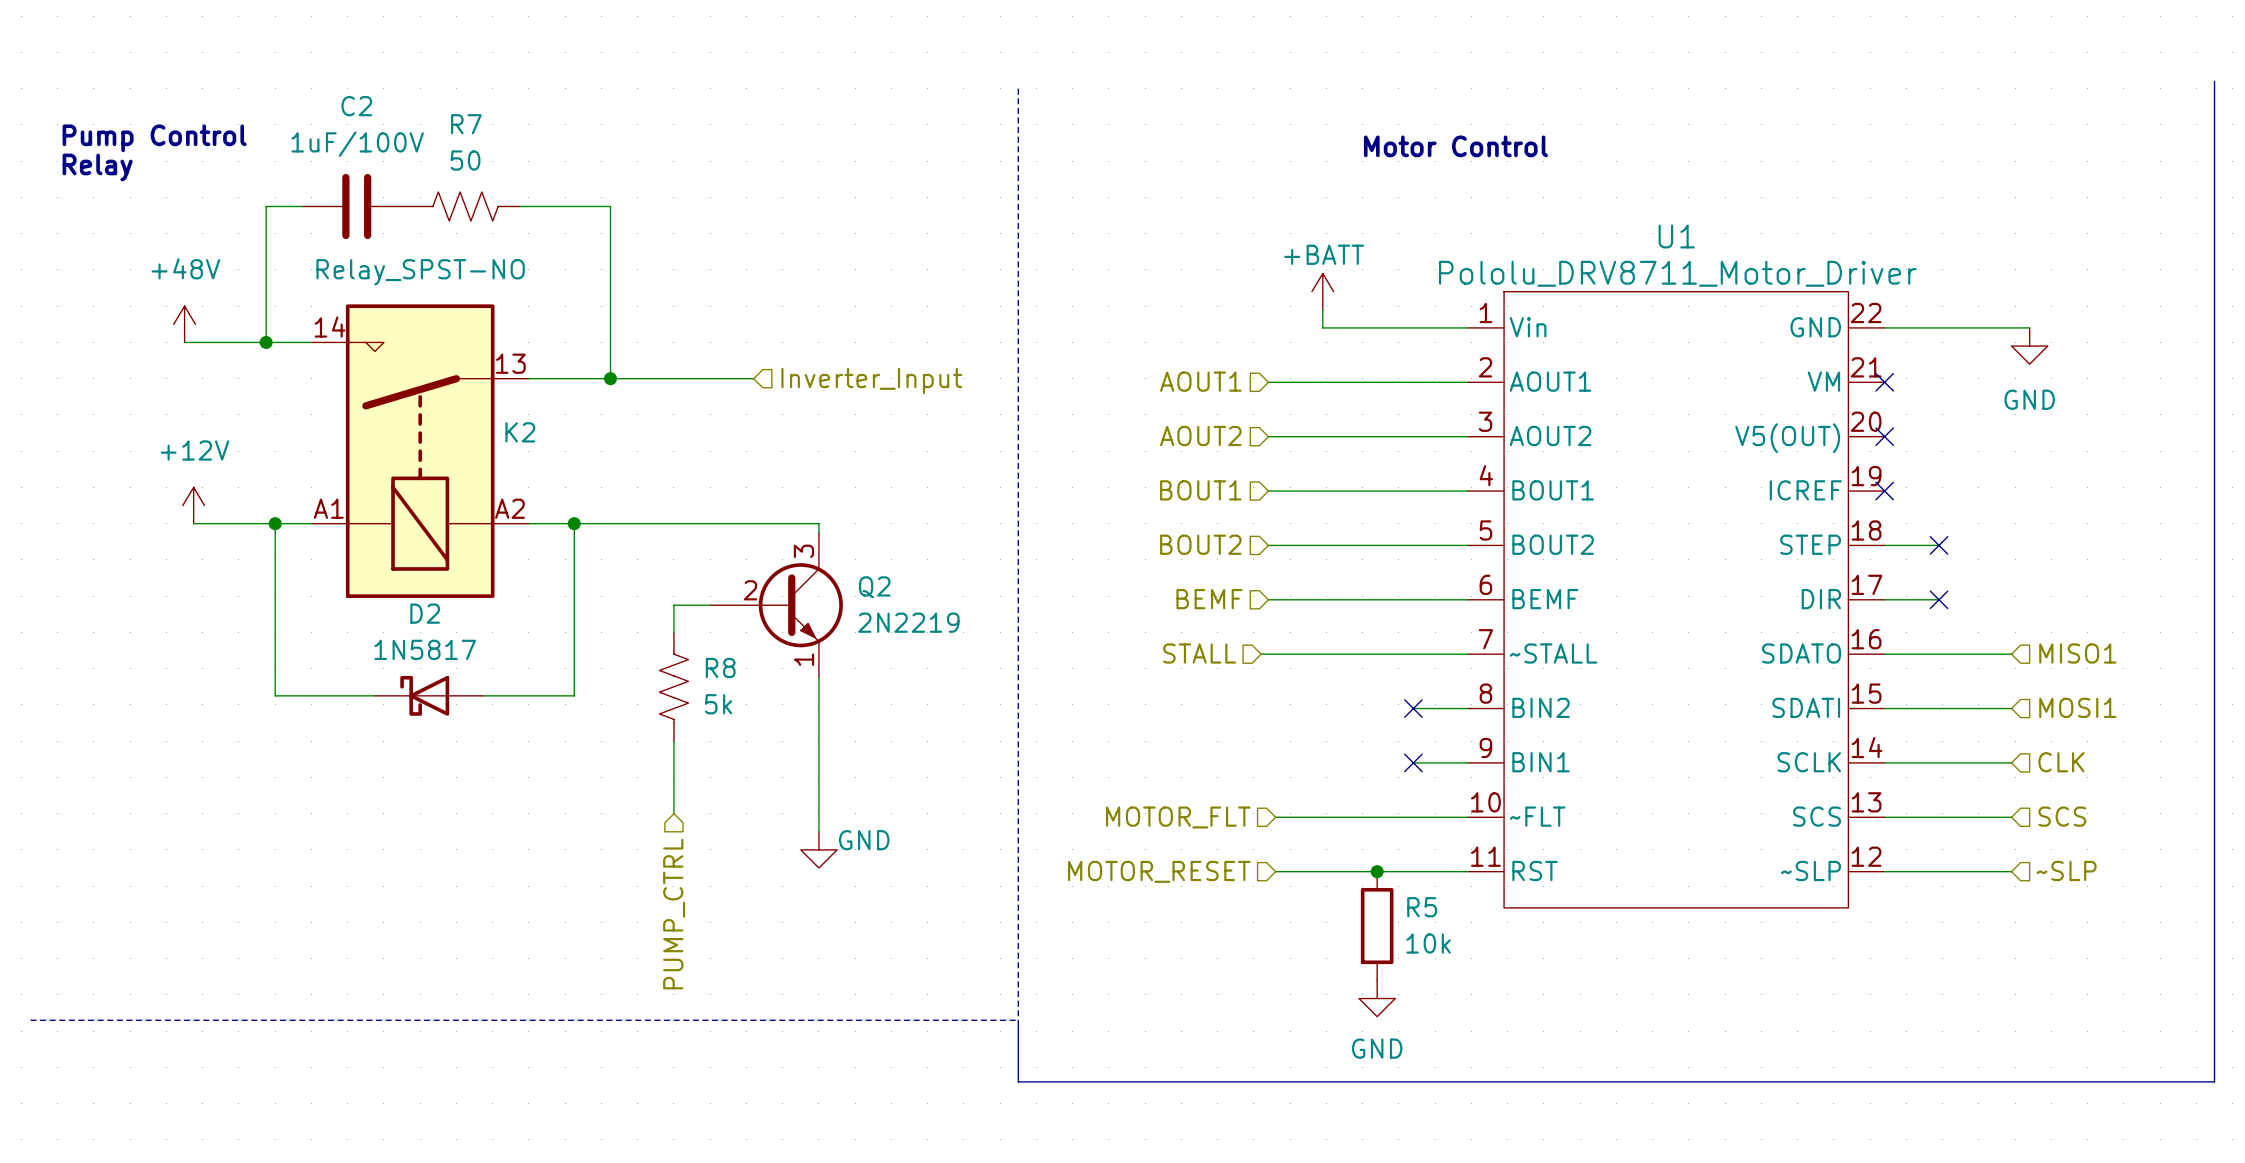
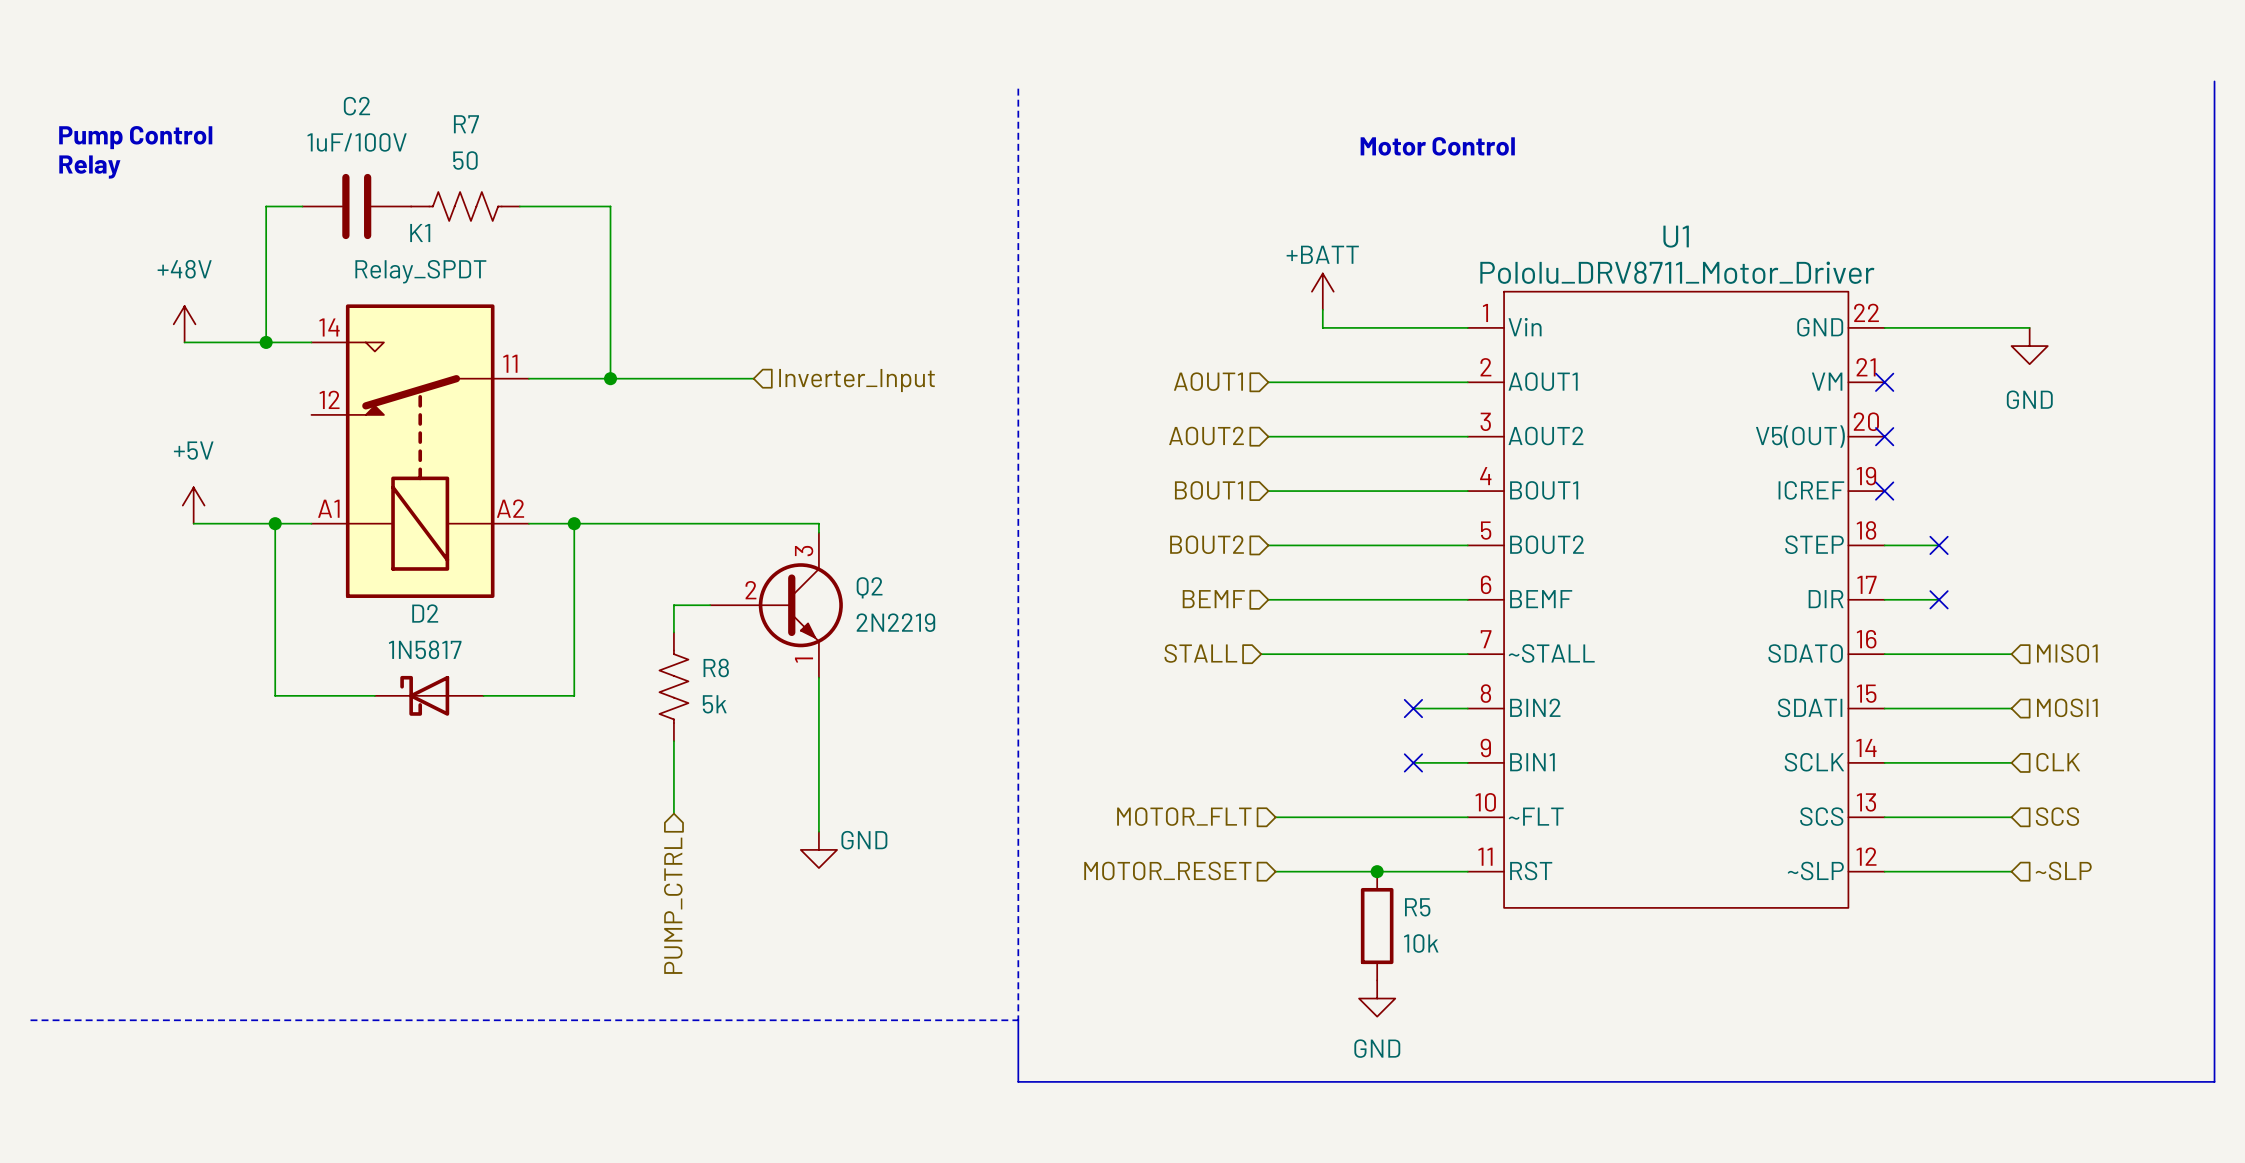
K2: Relay_SPST-NO (420, 451) -> none
K1: none -> Relay_SPDT (420, 451)
power symbol: +12V (193, 505) -> +5V (193, 505)

